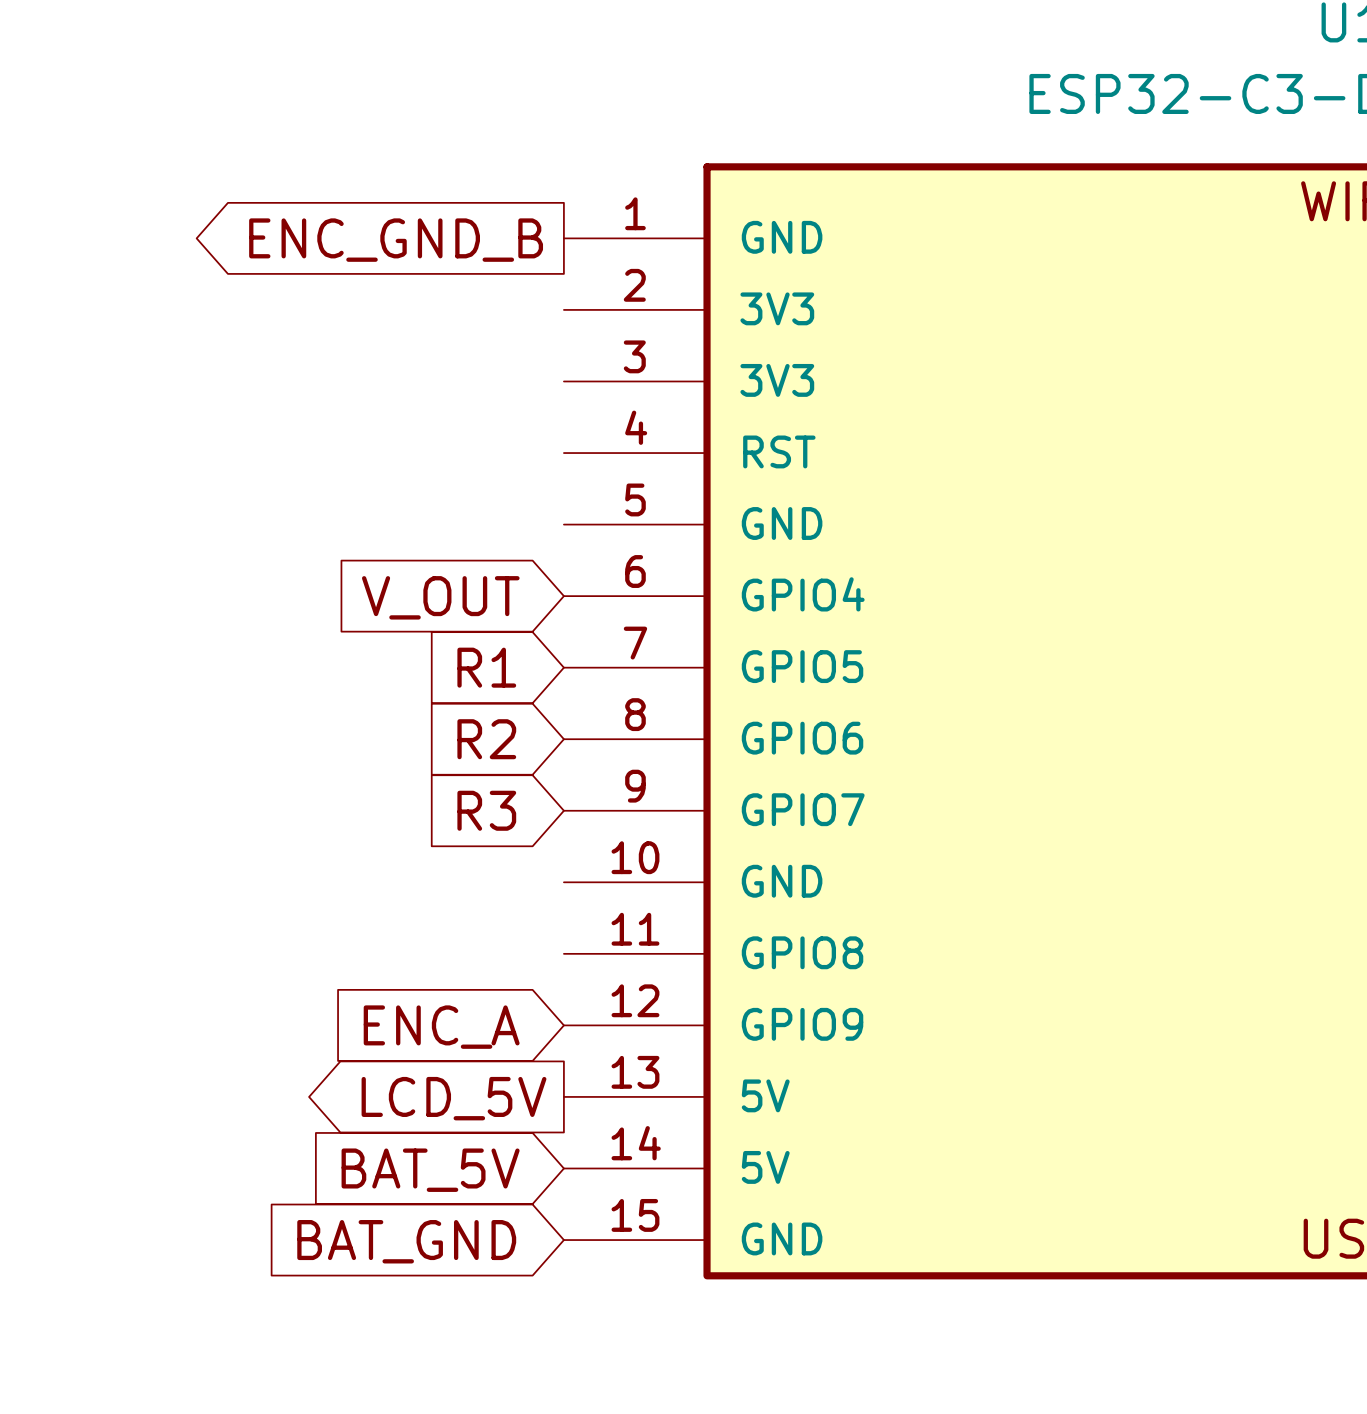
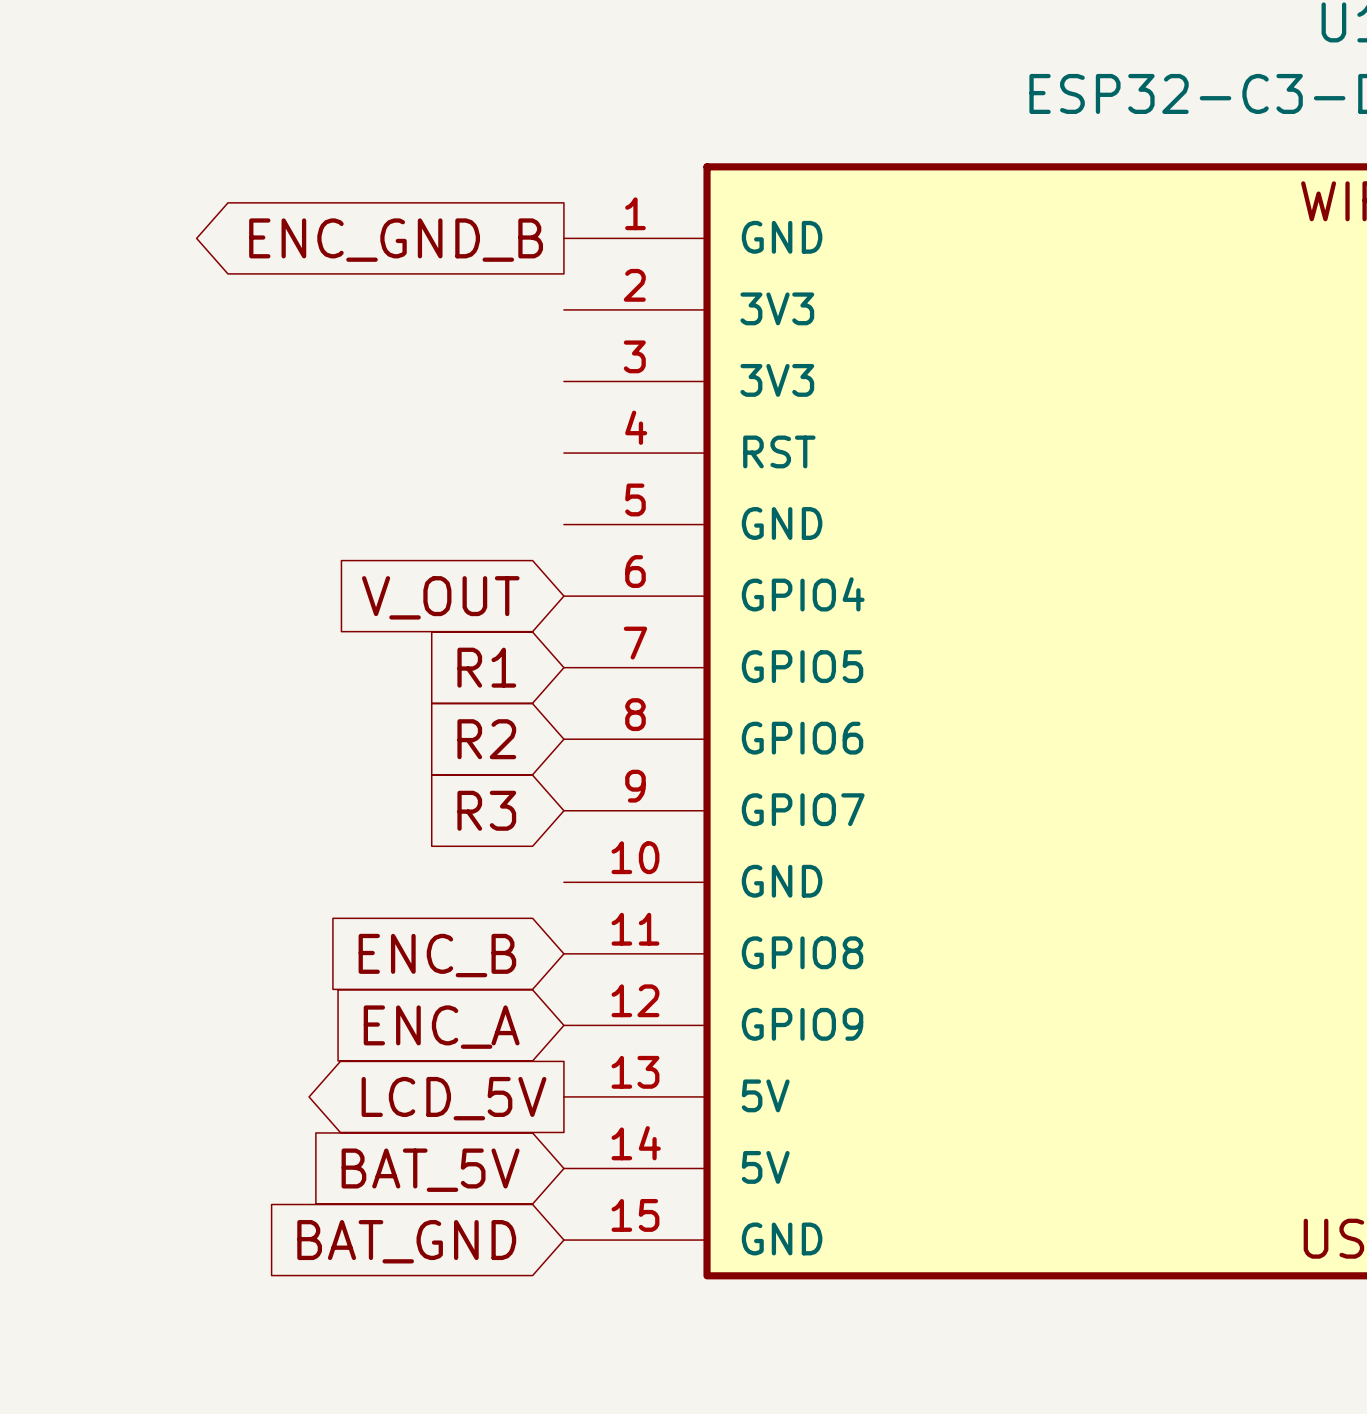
global label: none -> ENC_B (437, 955)

